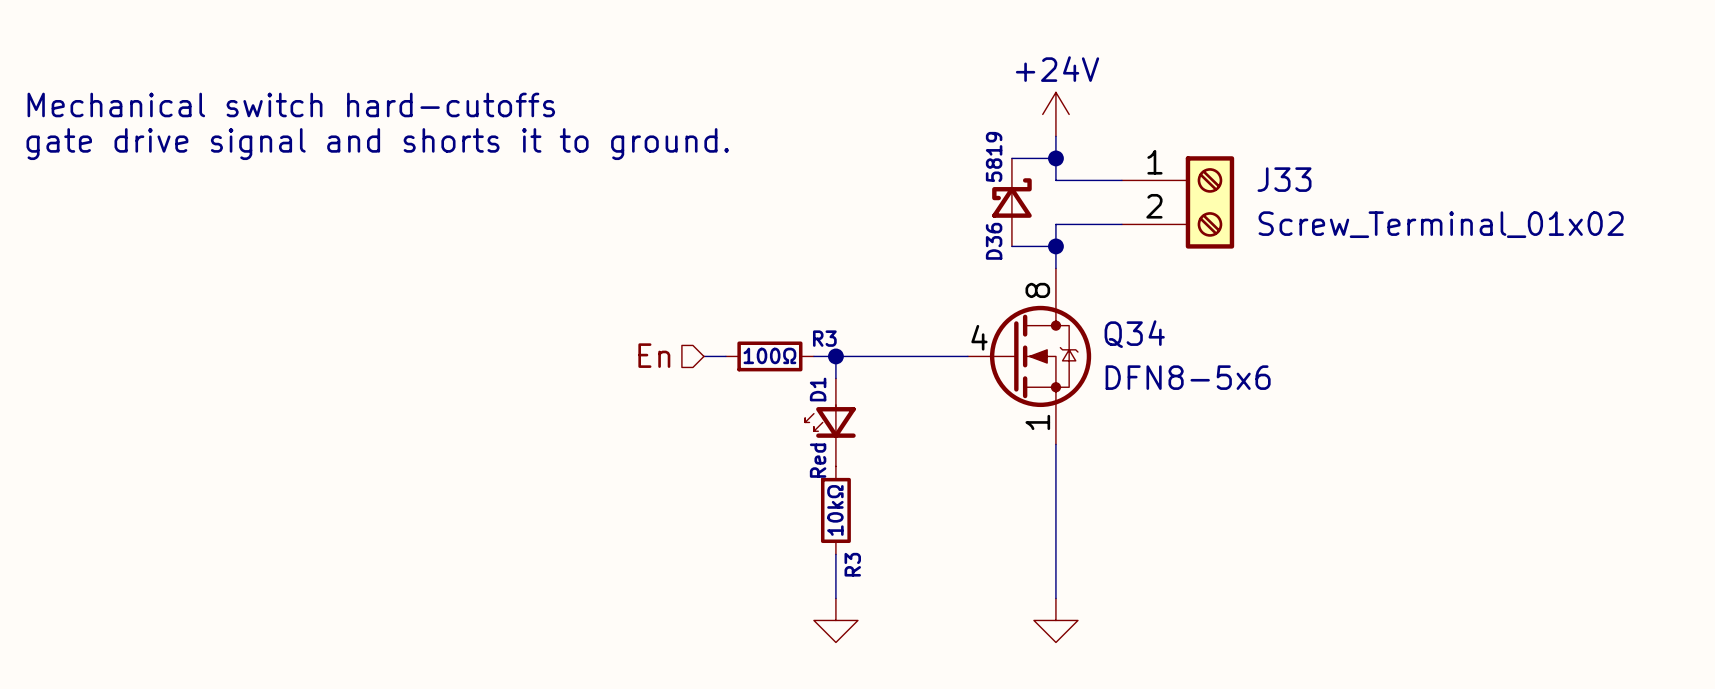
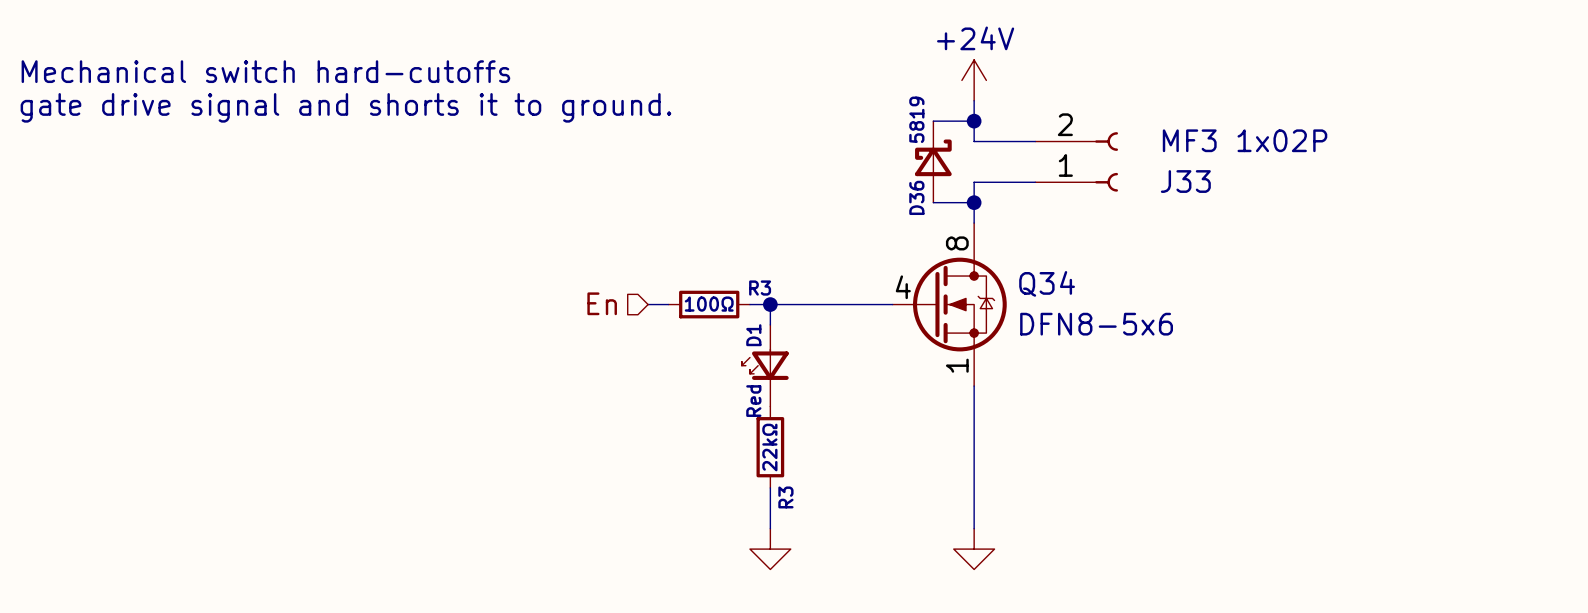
J33 symbol: [1121, 156, 1235, 249] -> [1035, 132, 1119, 192]
J33 name position: J33 (1284, 179) -> J33 (1185, 181)
J33 value: Screw_Terminal_01x02 (1441, 224) -> MF3 1x02P (1245, 140)
R3 value: 10kΩ (835, 510) -> 22kΩ (769, 447)

